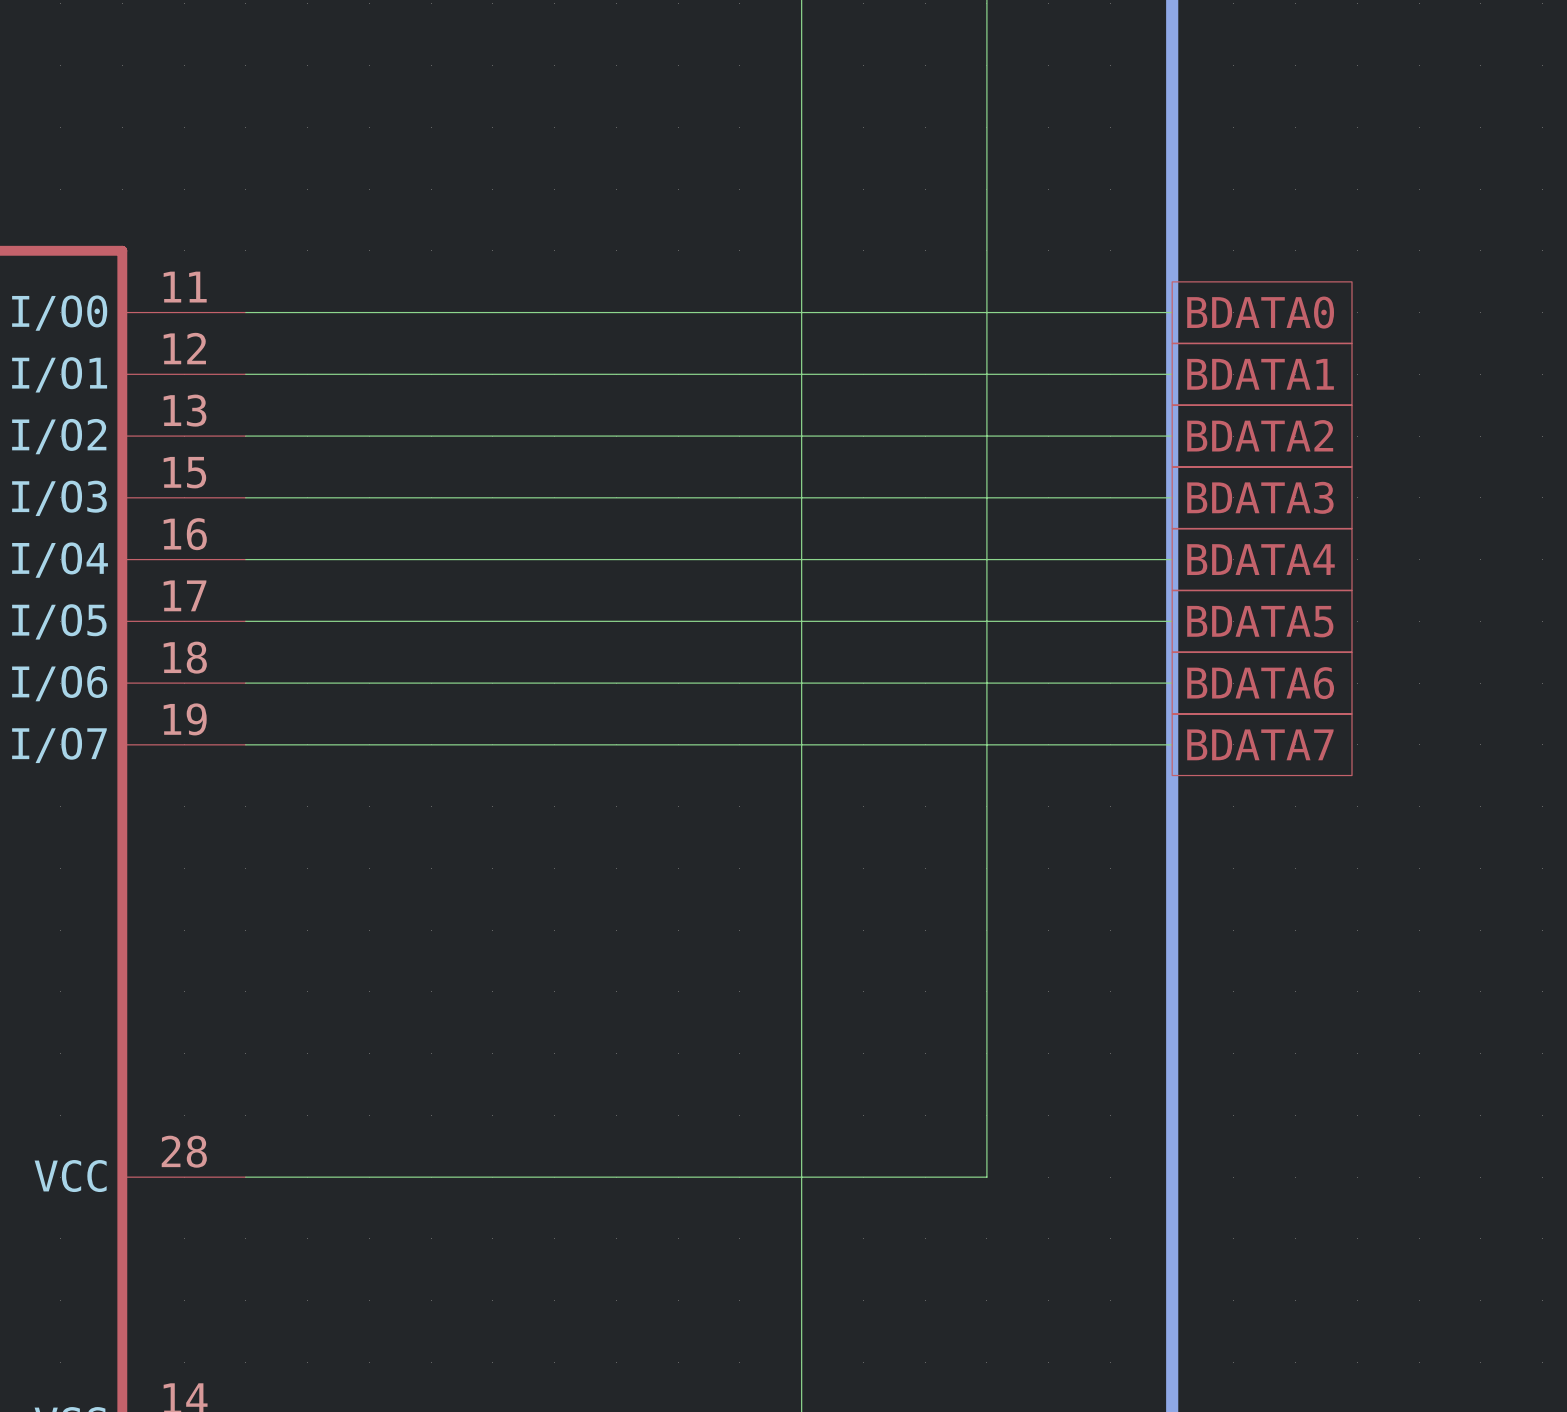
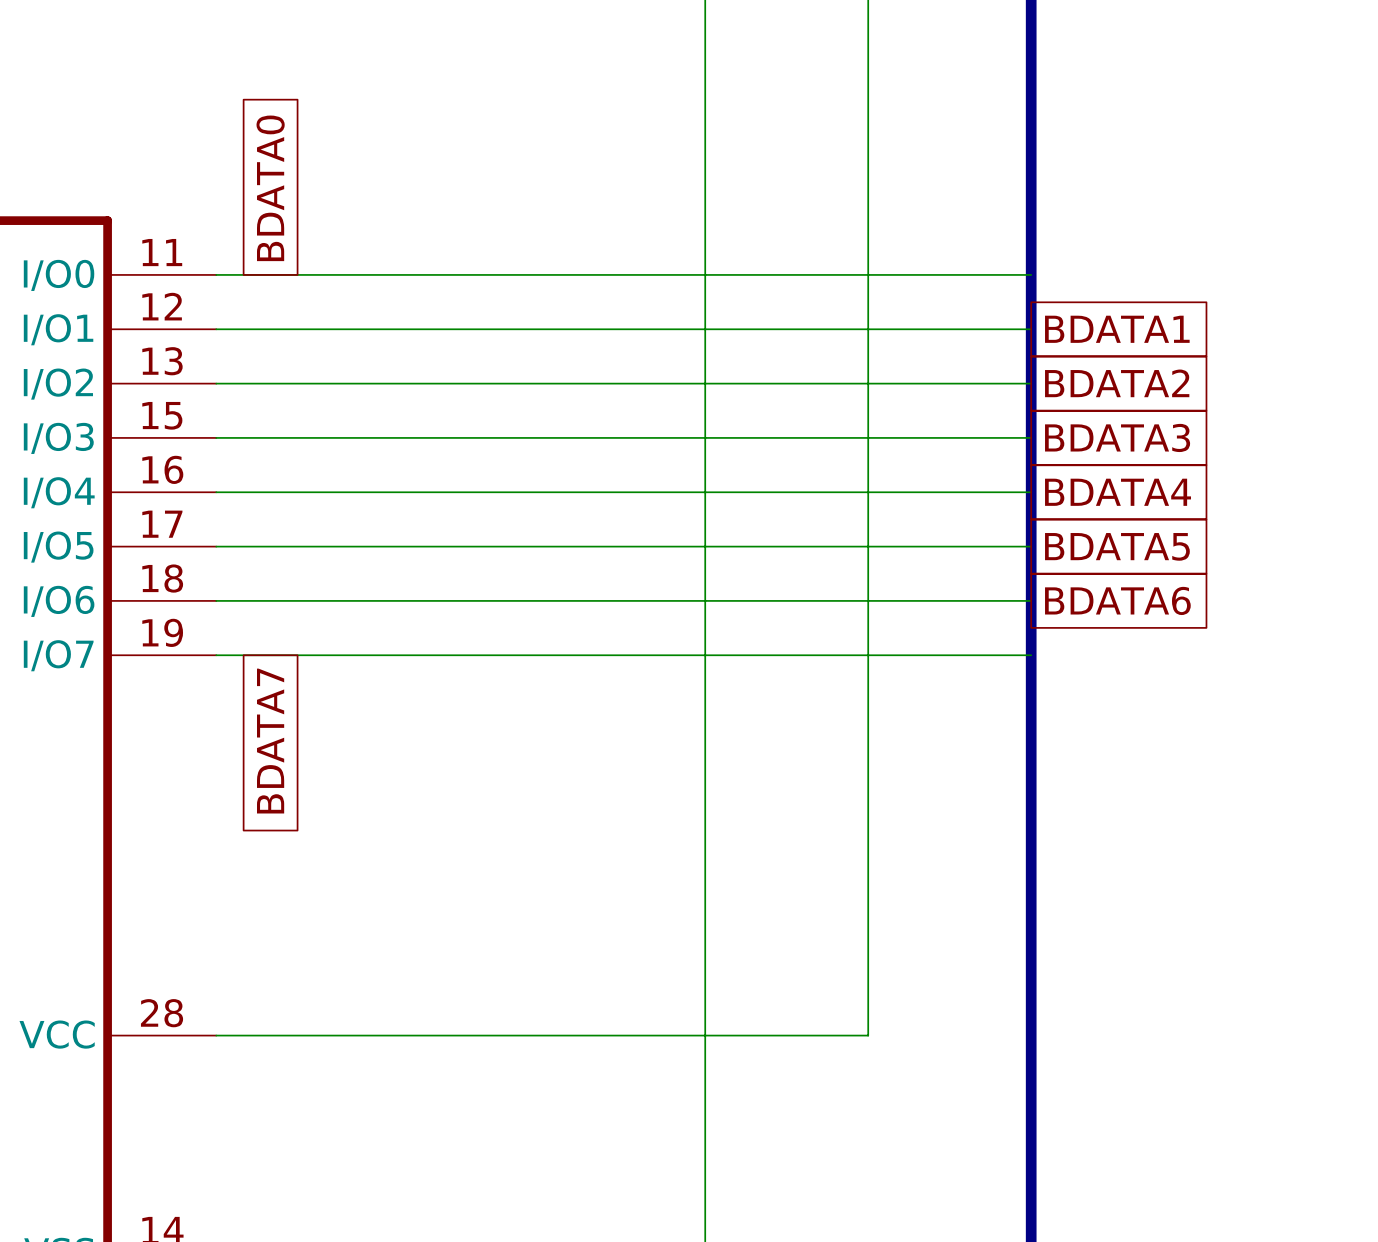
global label: none -> BDATA0 (270, 188)
global label: BDATA0 (1260, 312) -> none
global label: BDATA7 (1260, 744) -> none
global label: none -> BDATA7 (270, 741)

